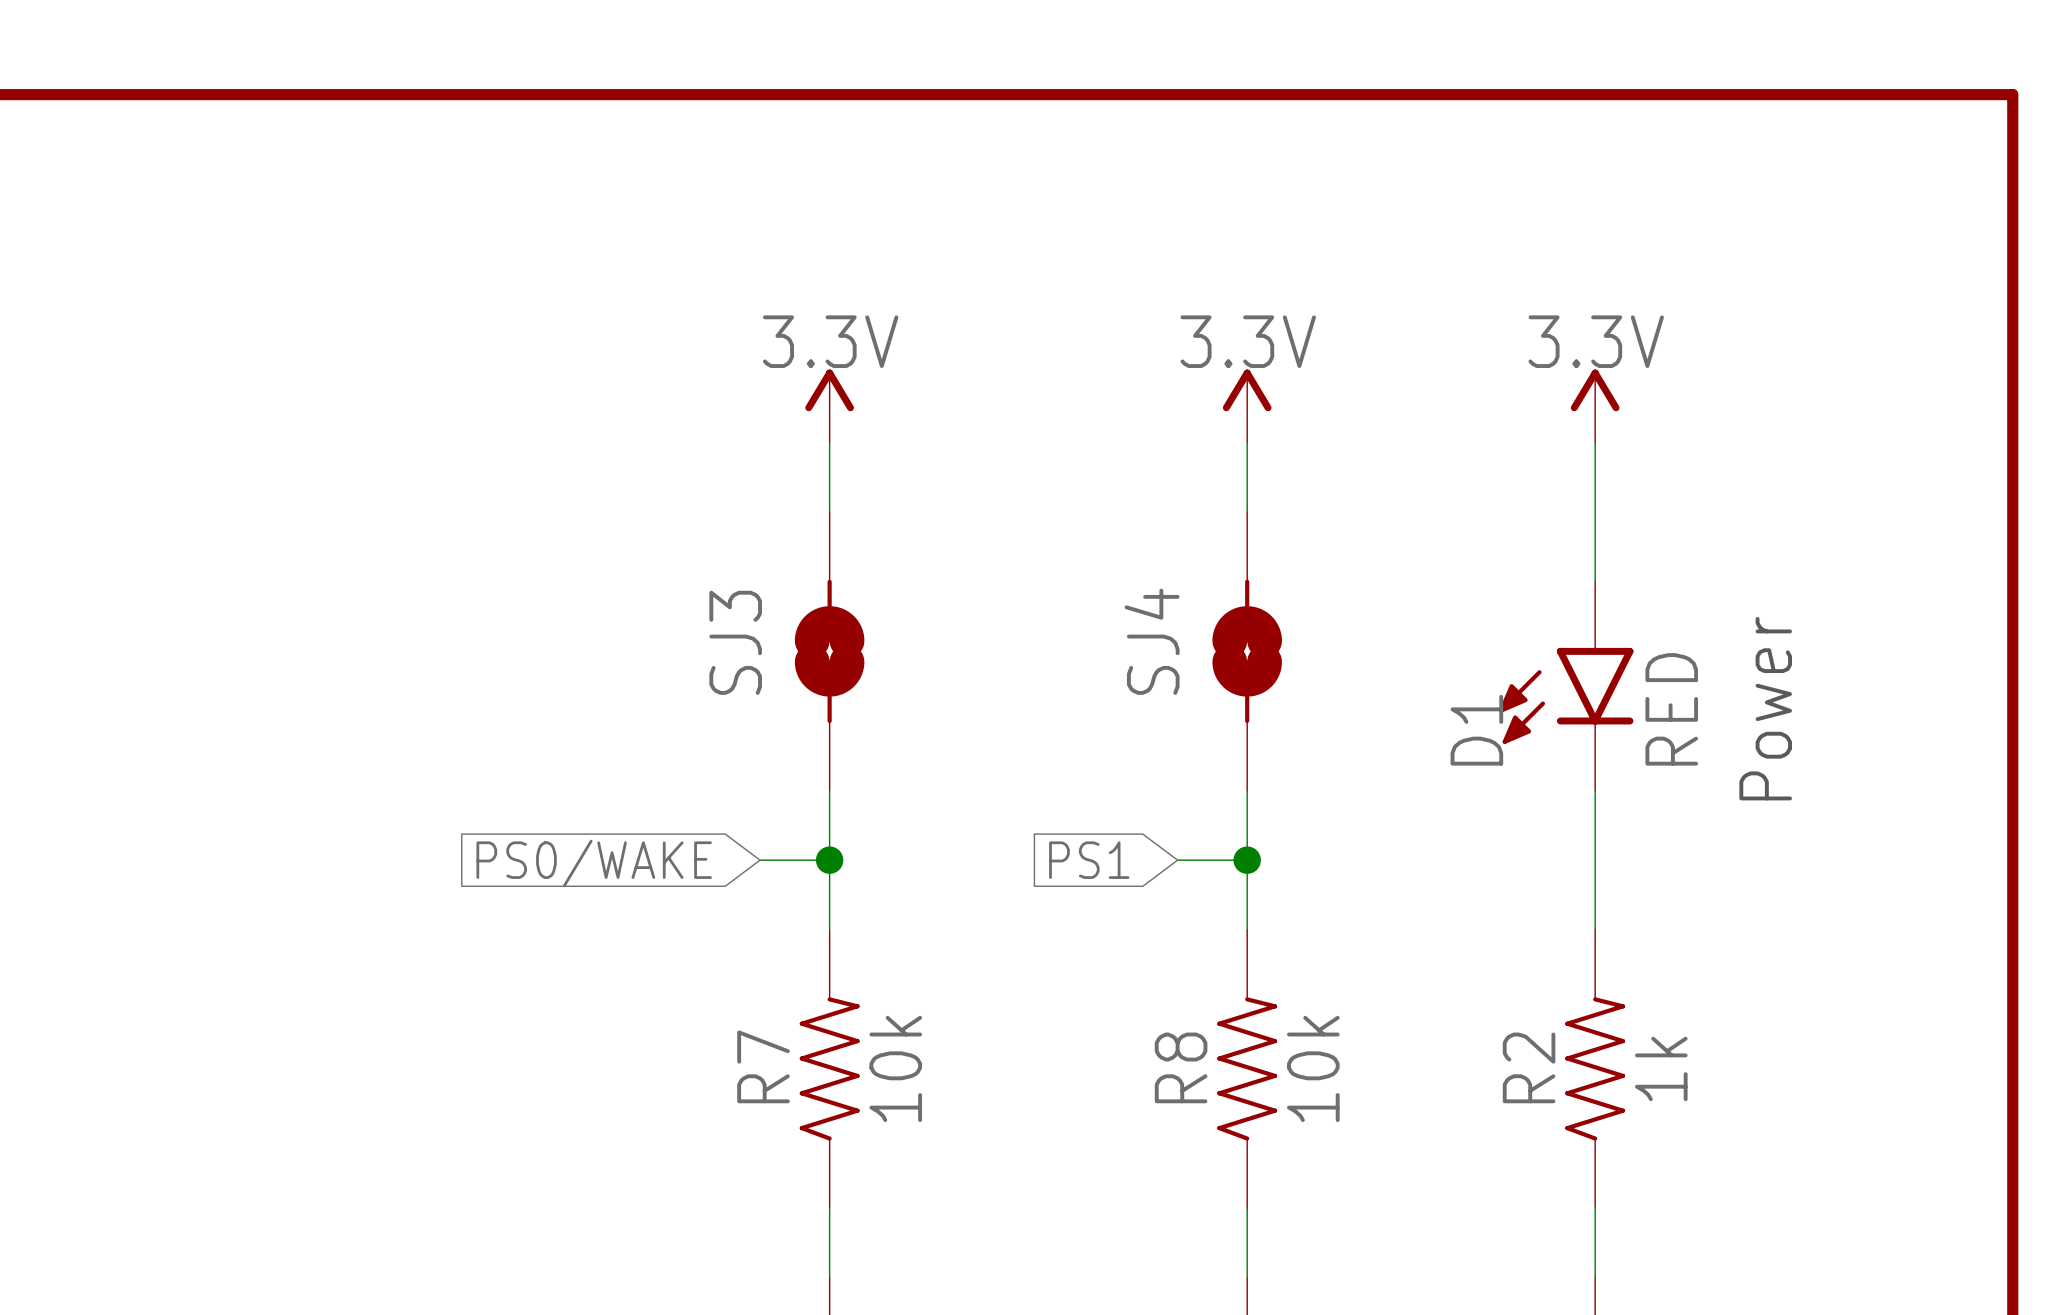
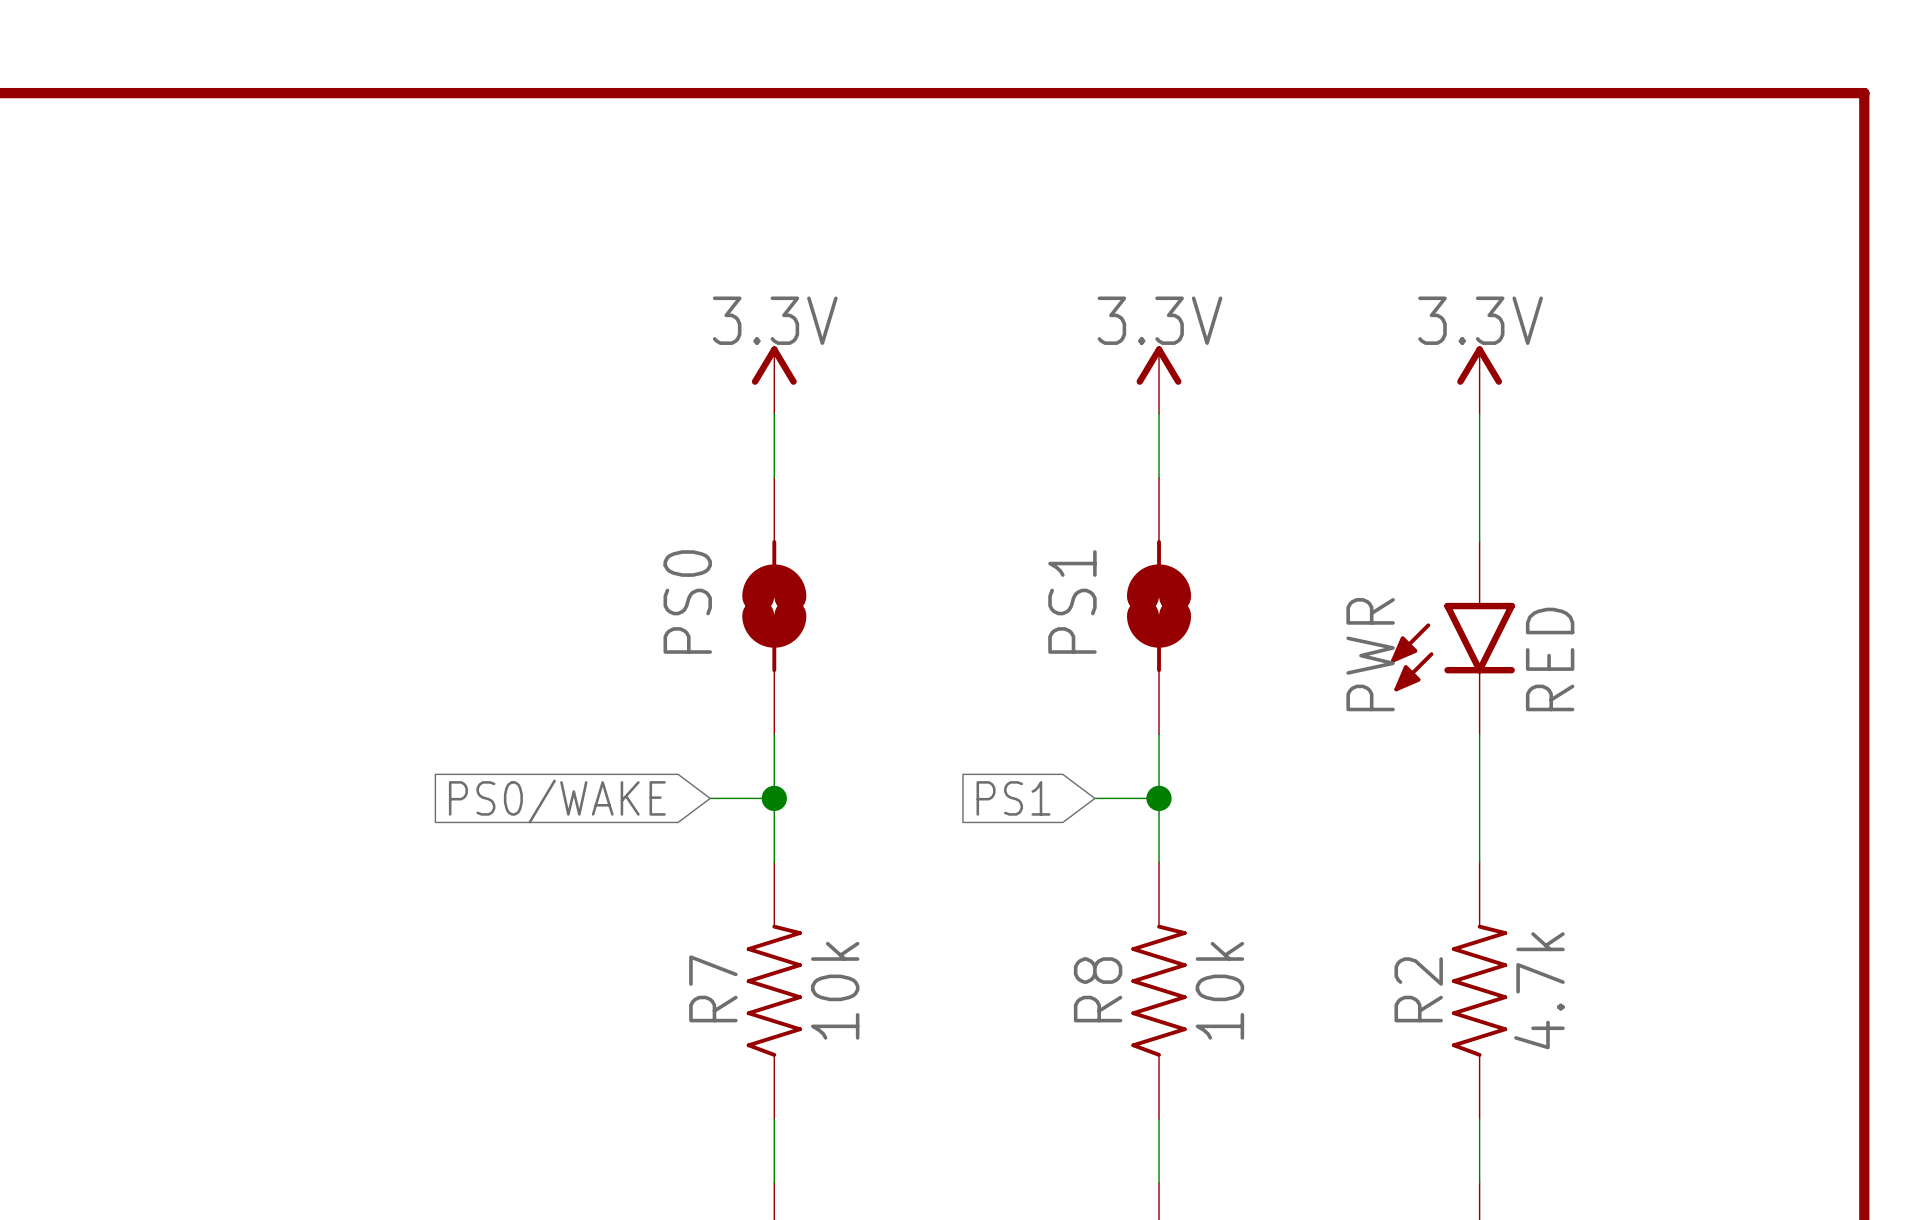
SJ4 name: SJ4 (1152, 641) -> PS1 (1072, 602)
SJ3 name: SJ3 (735, 642) -> PS0 (687, 602)
text: Power (1765, 708) -> none
D1 name: D1 (1476, 730) -> PWR (1370, 654)
R2 value: 1k (1661, 1068) -> 4.7k (1539, 990)

